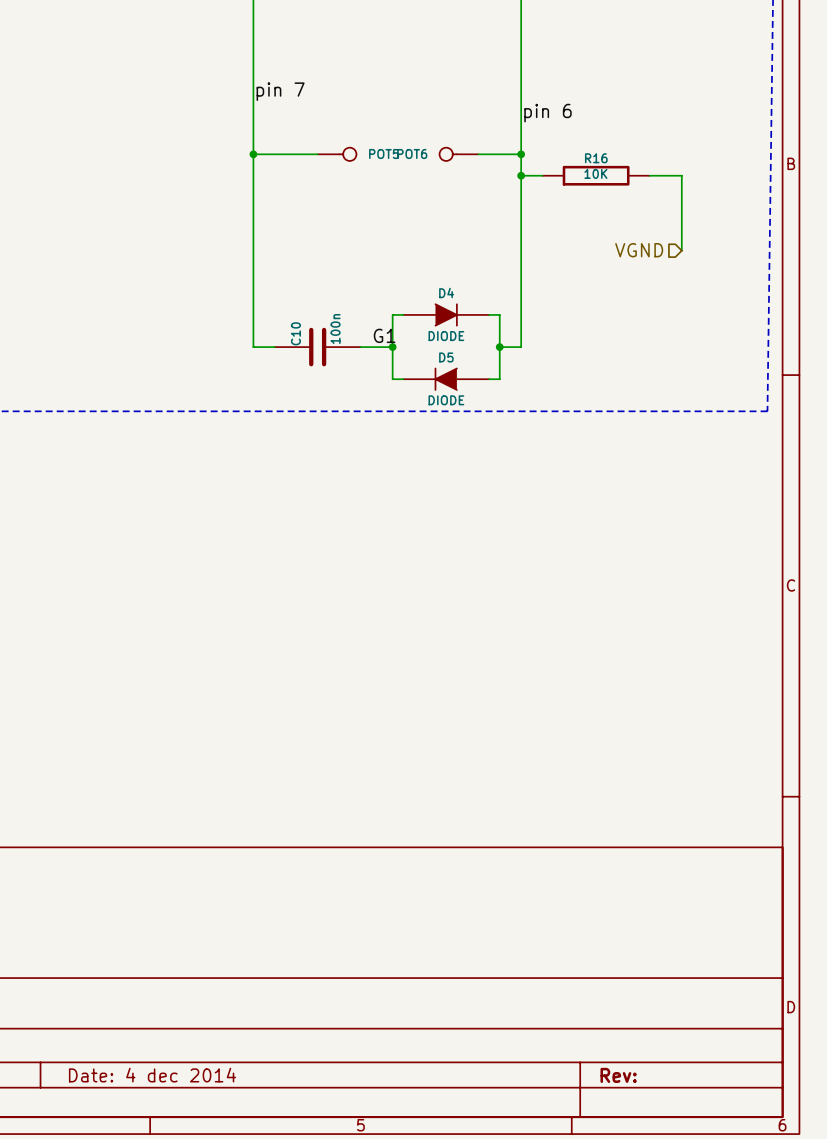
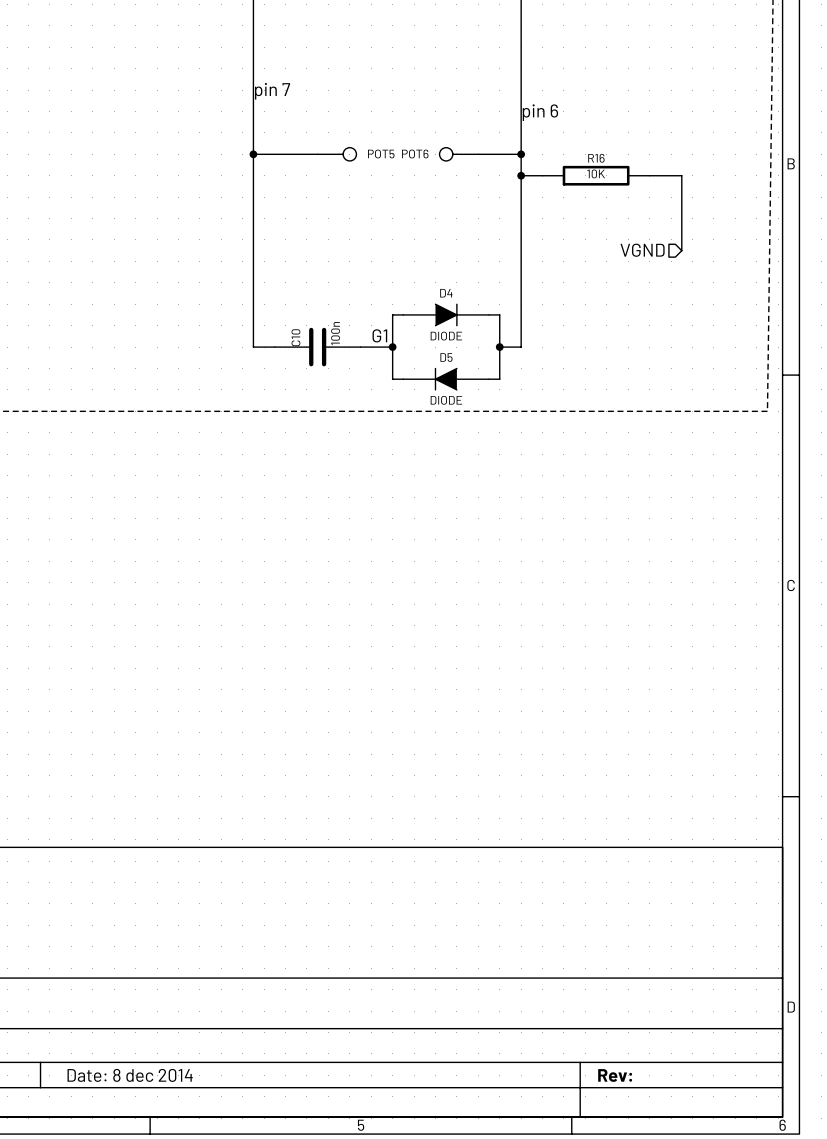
title block: Date: 4 dec 2014 (152, 1075) -> Date: 8 dec 2014 (130, 1075)

